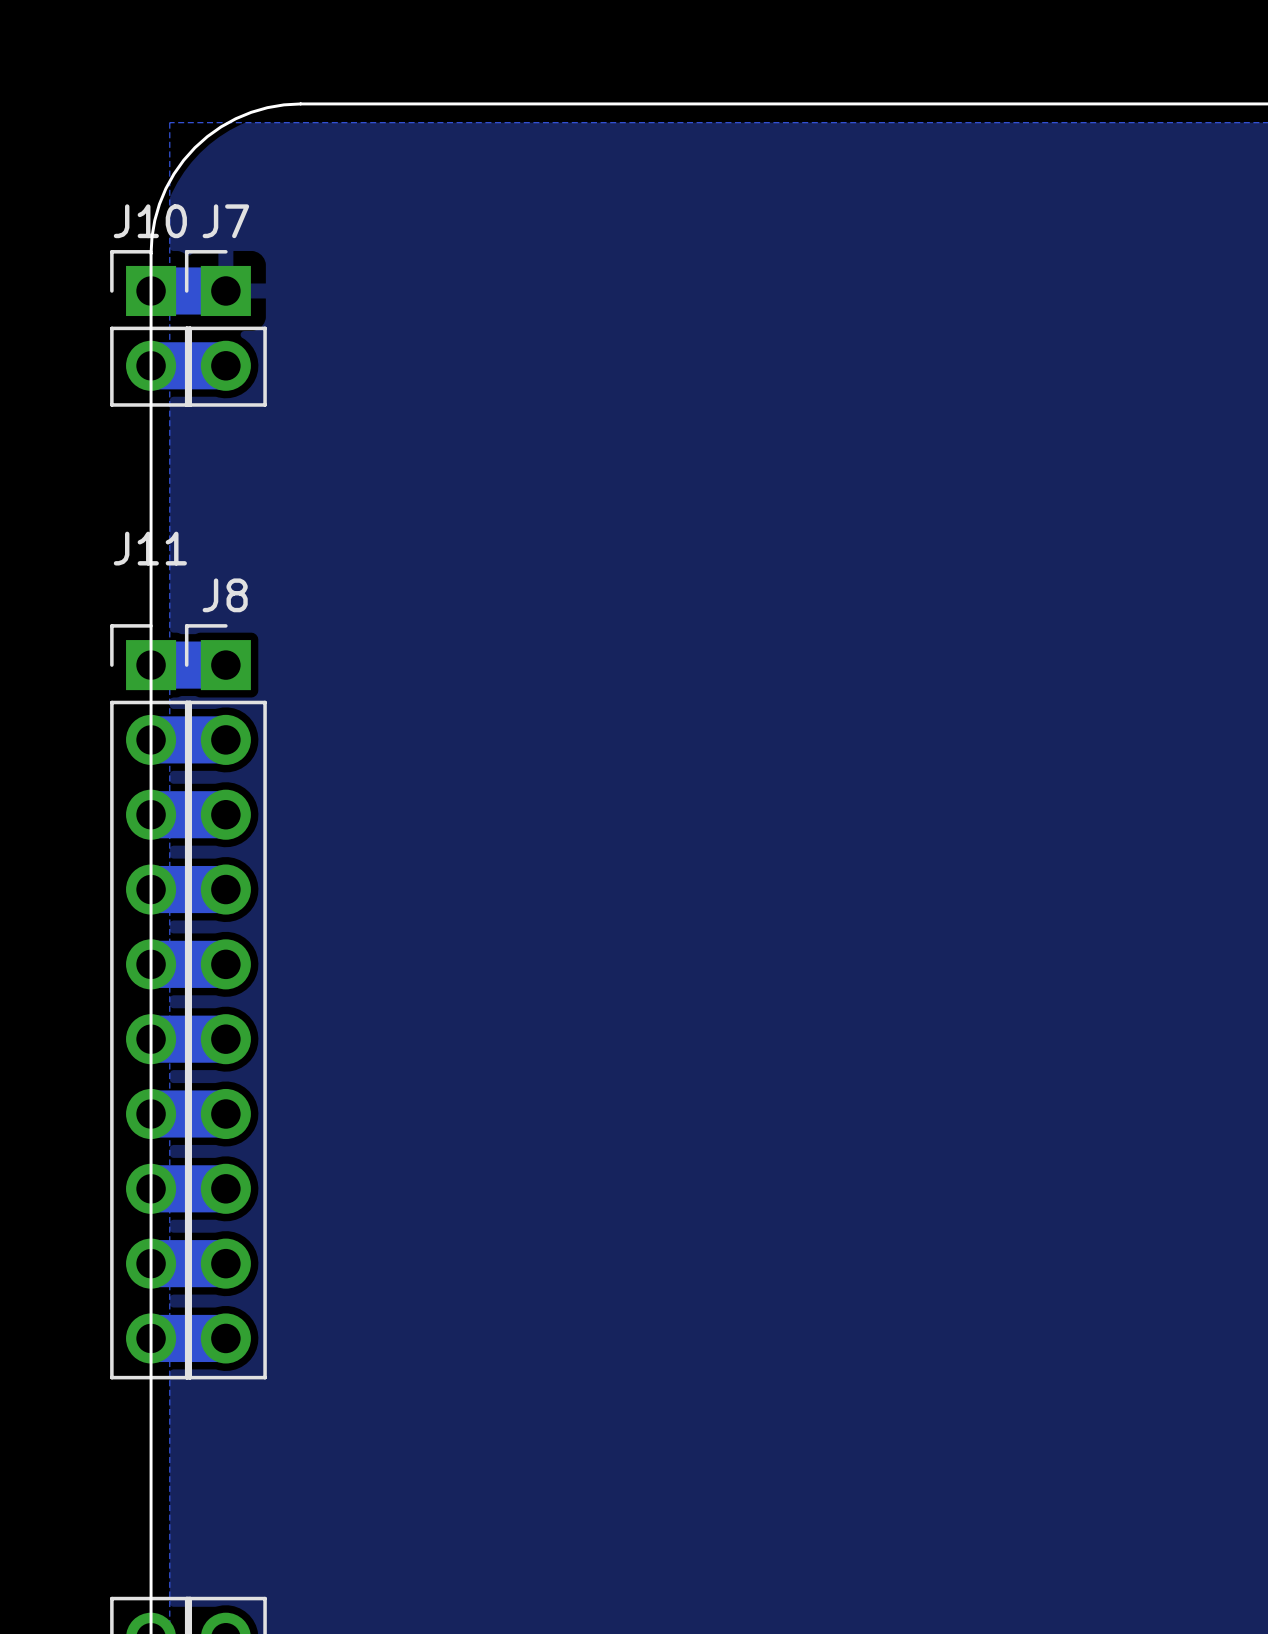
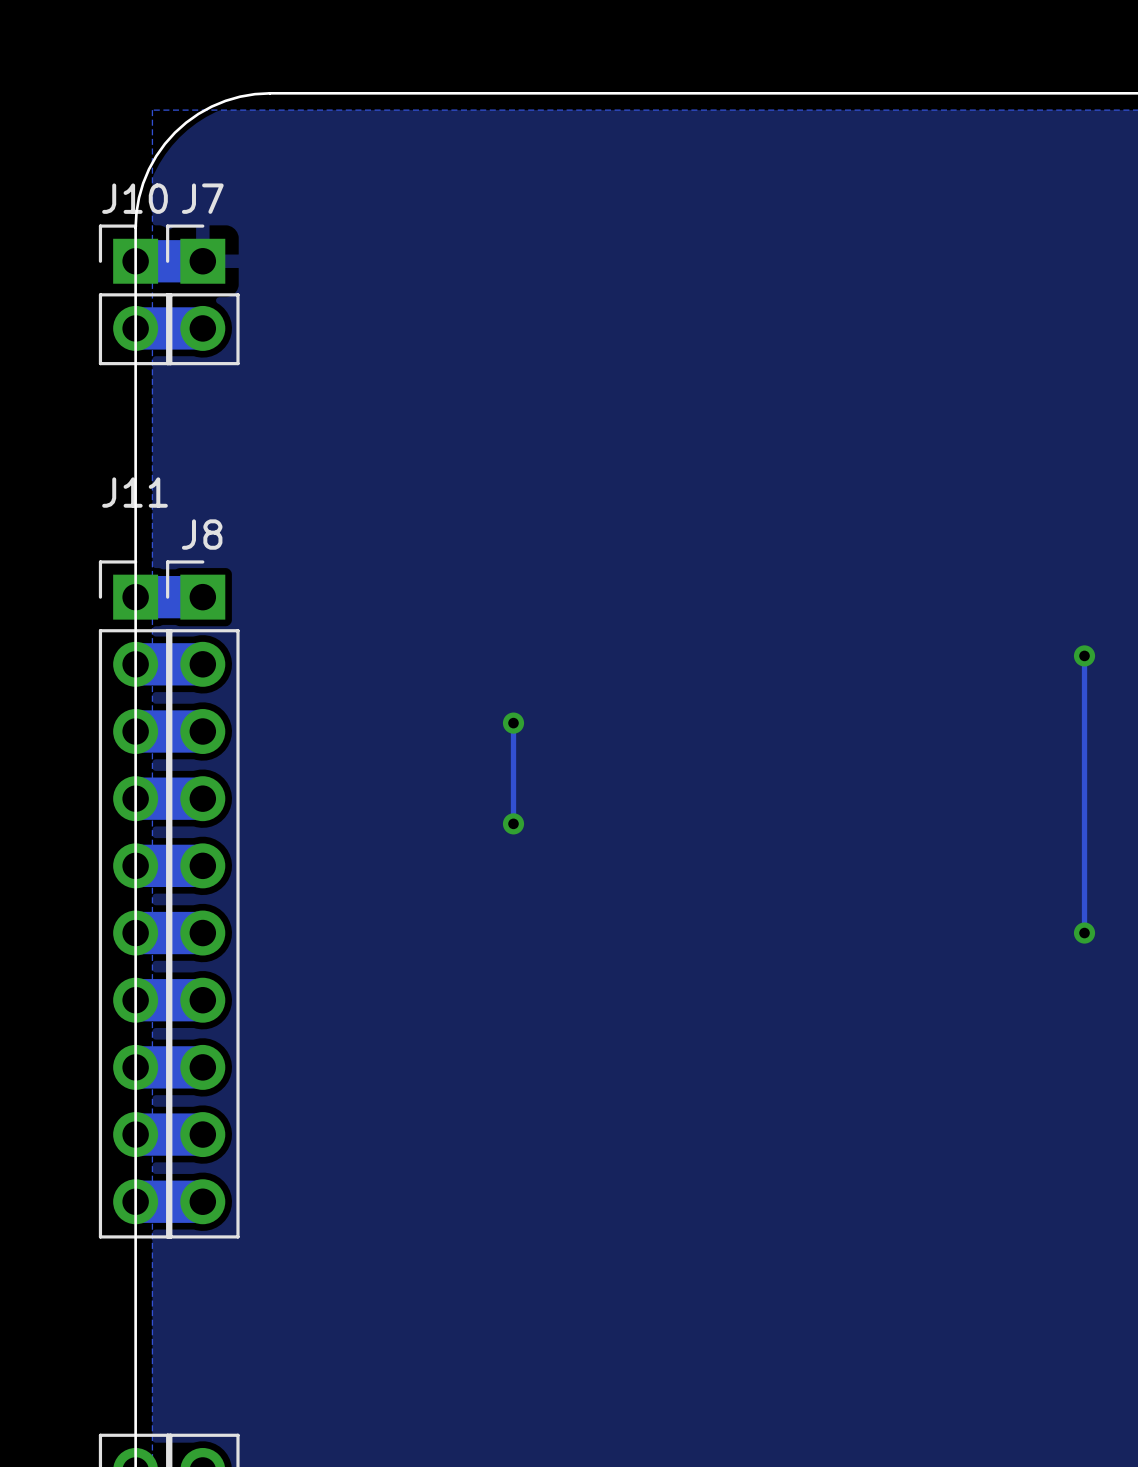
track: none -> (1084, 655) (1084, 933)
via: none -> (1084, 655)
track: none -> (513, 723) (513, 823)
via: none -> (513, 723)
via: none -> (513, 823)
via: none -> (1084, 933)

